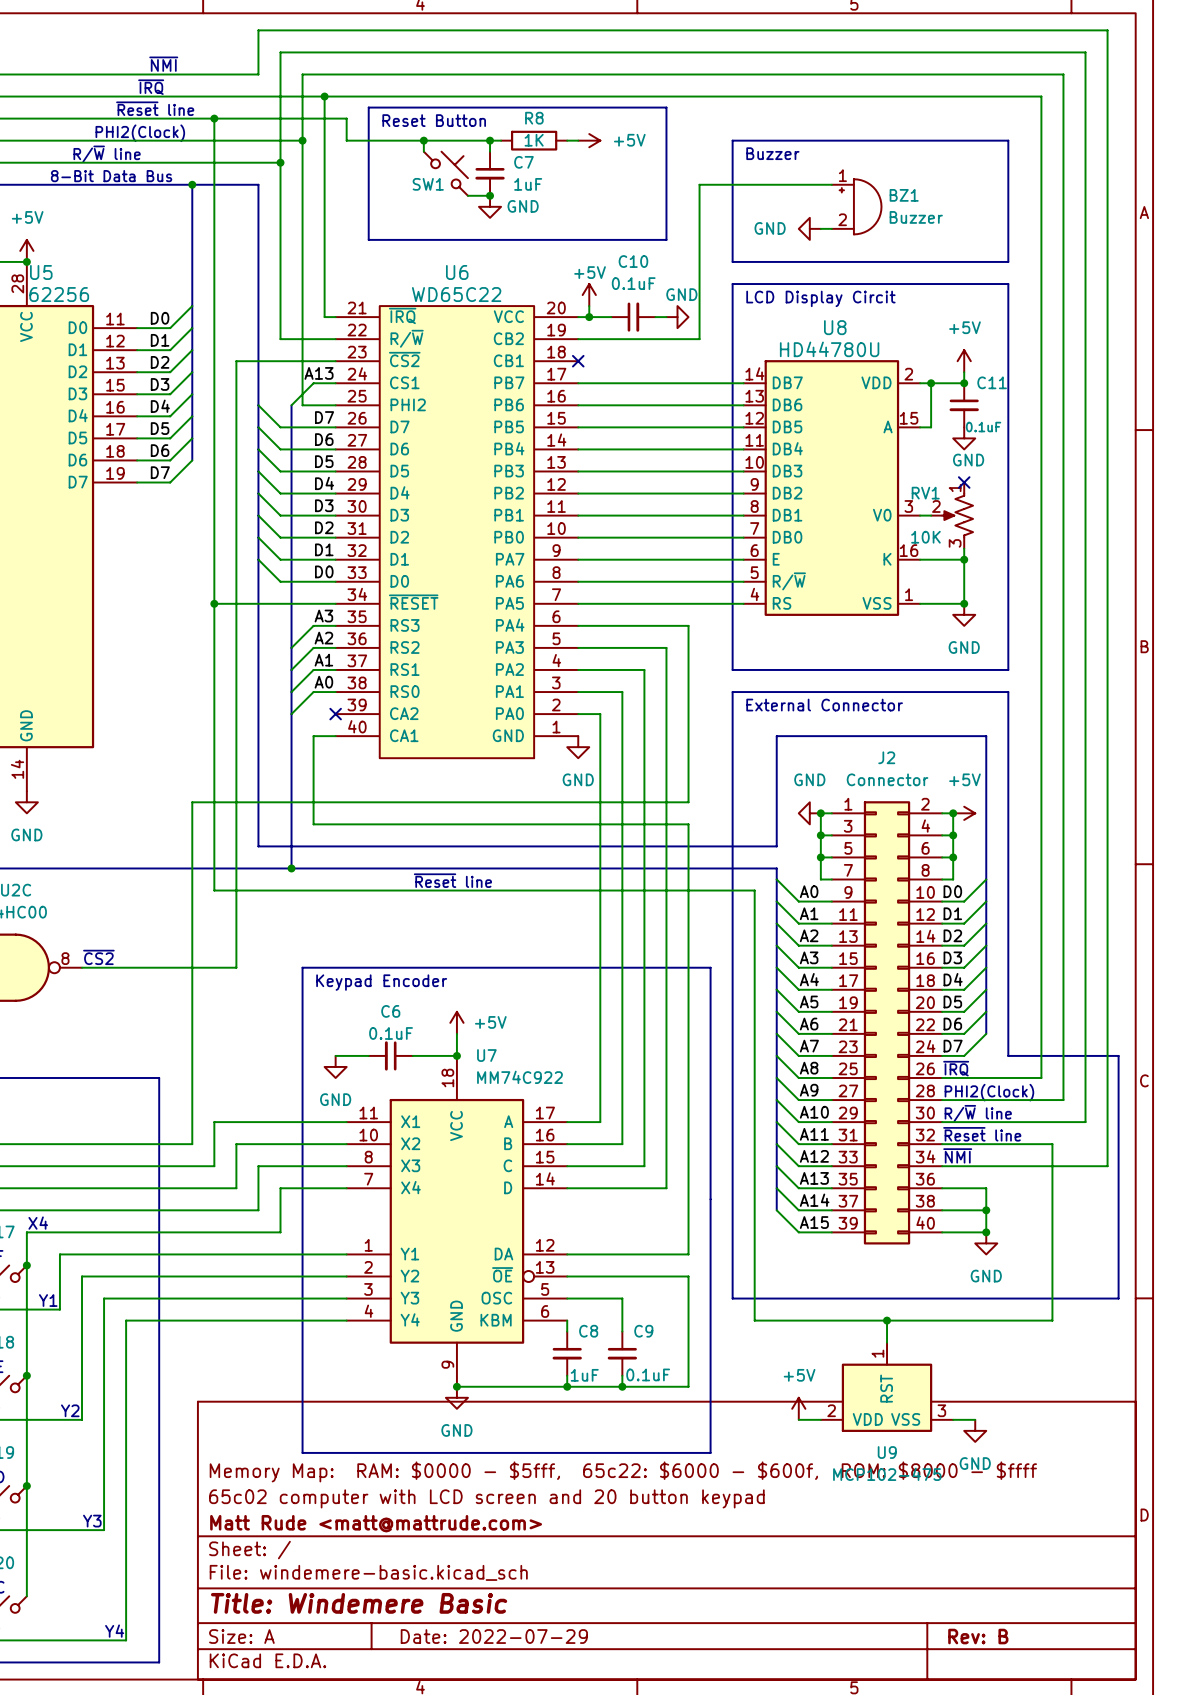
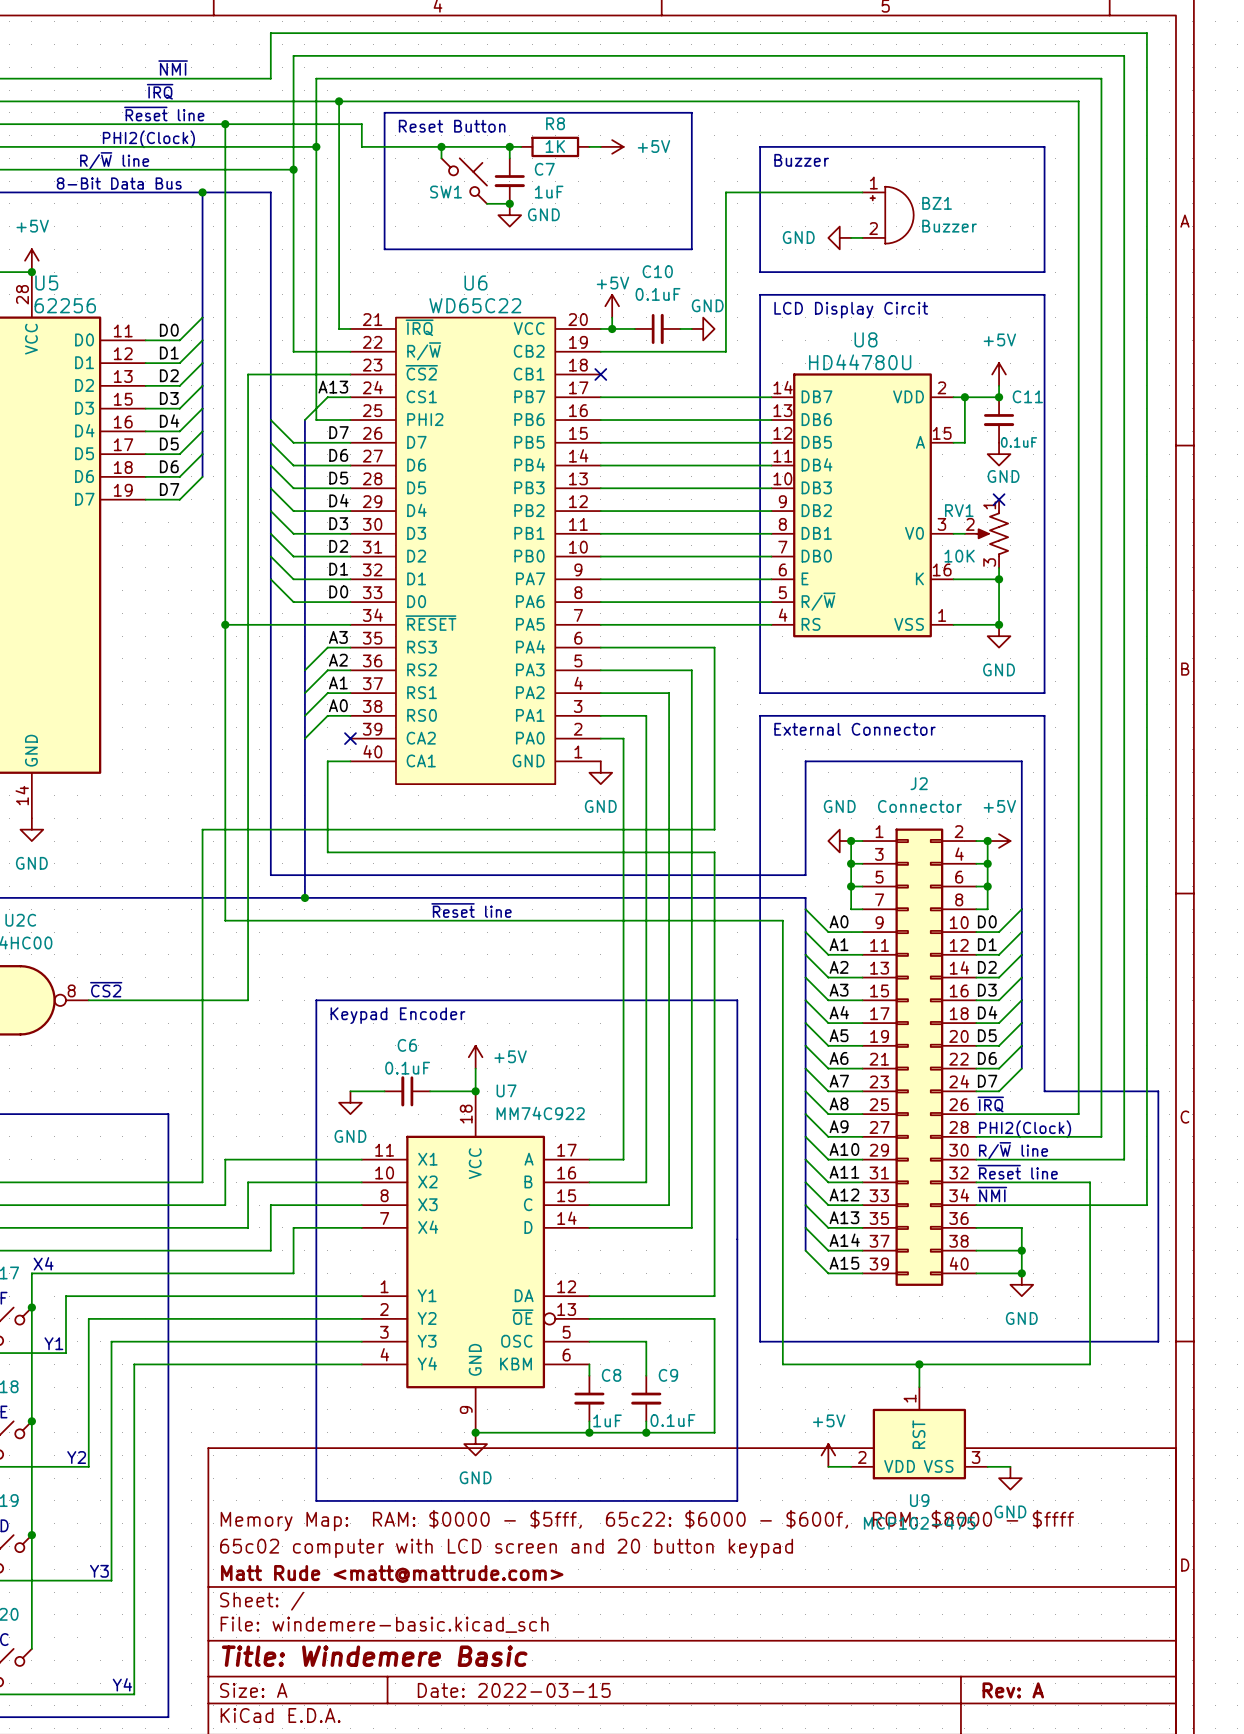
title block: Date: 2022-07-29 (494, 1636) -> Date: 2022-03-15 (514, 1690)
title block: Rev: B (978, 1636) -> Rev: A (1013, 1690)

